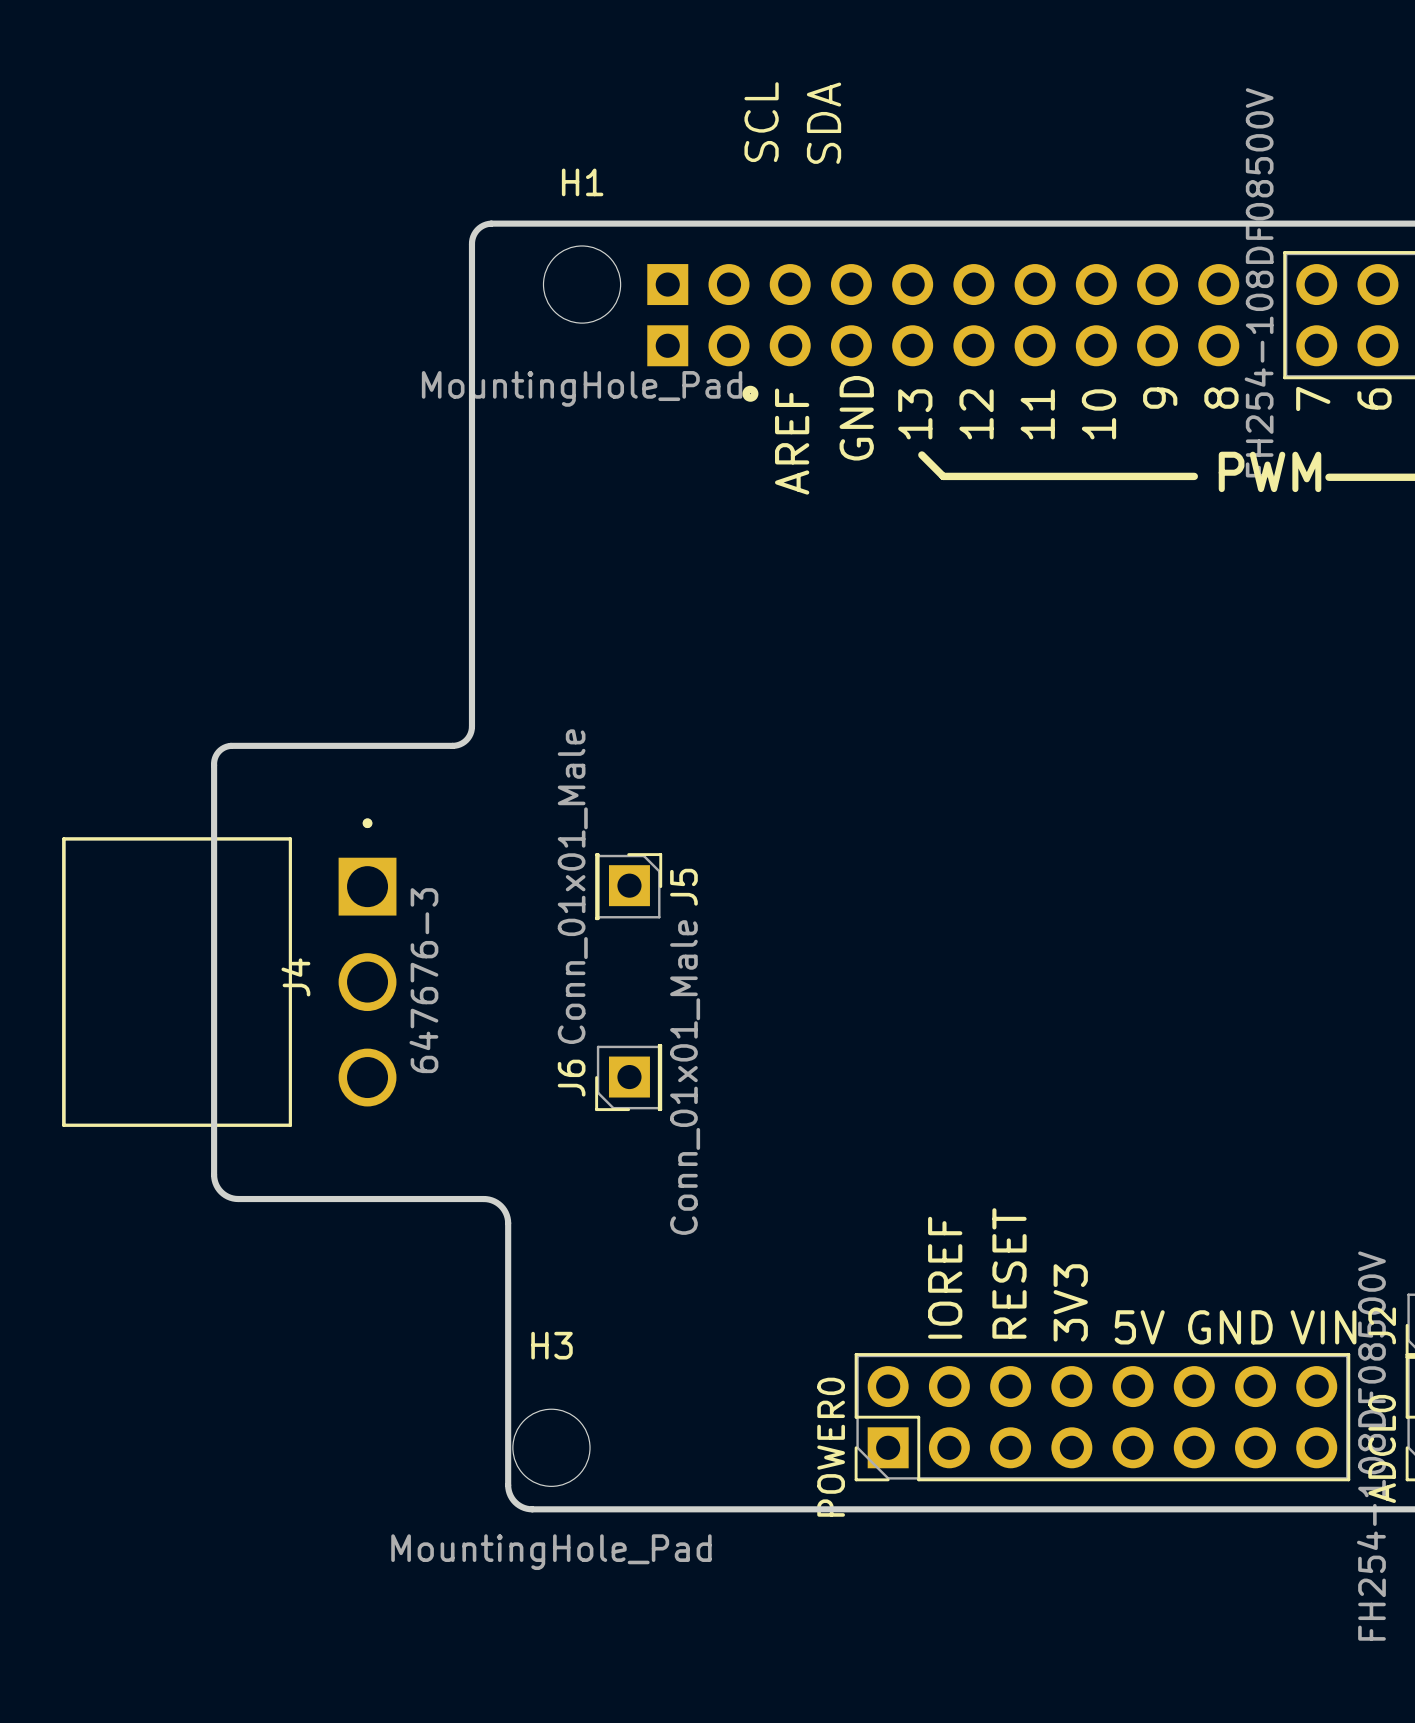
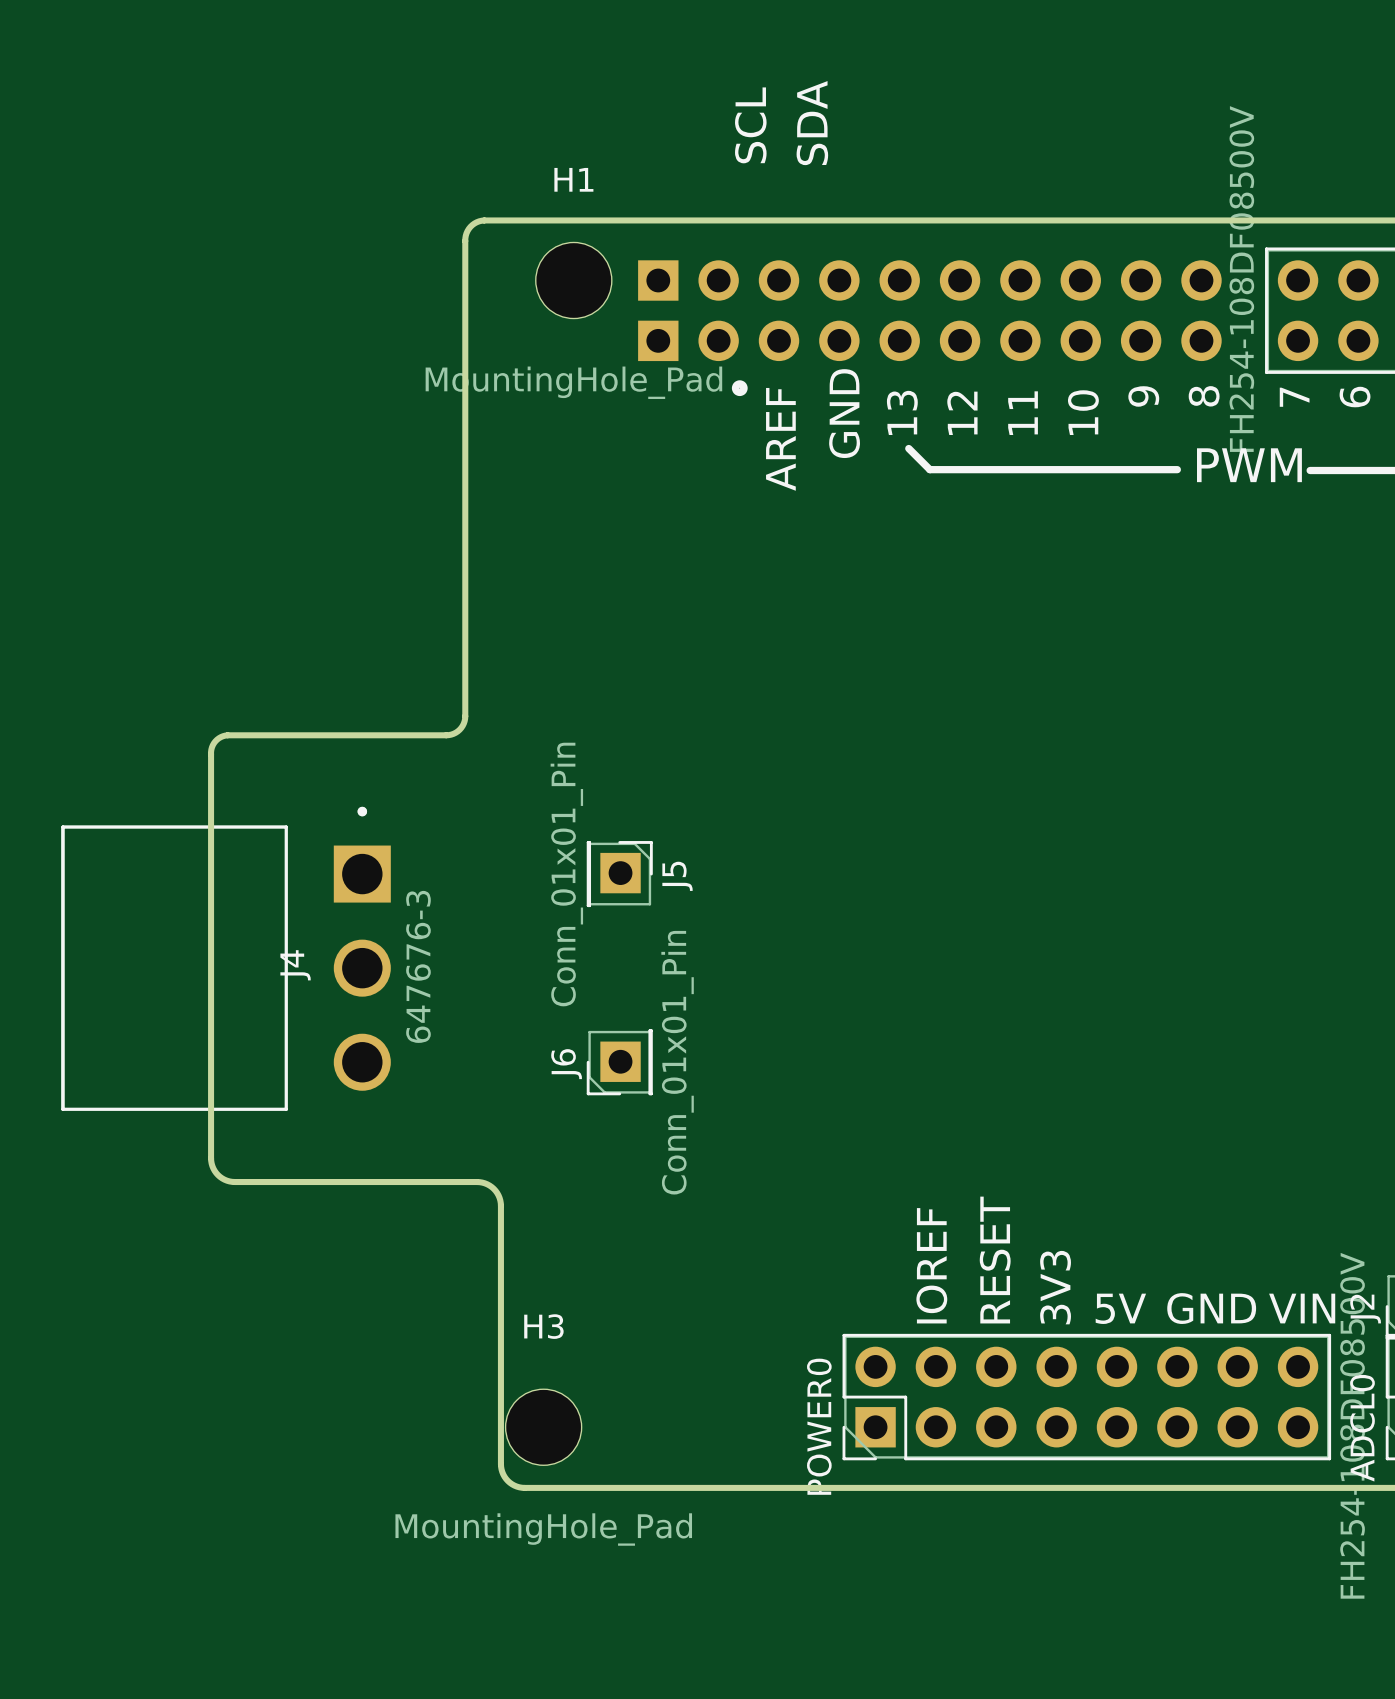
J5 value: Conn_01x01_Male (572, 886) -> Conn_01x01_Pin (566, 874)
J6 value: Conn_01x01_Male (685, 1077) -> Conn_01x01_Pin (677, 1062)

